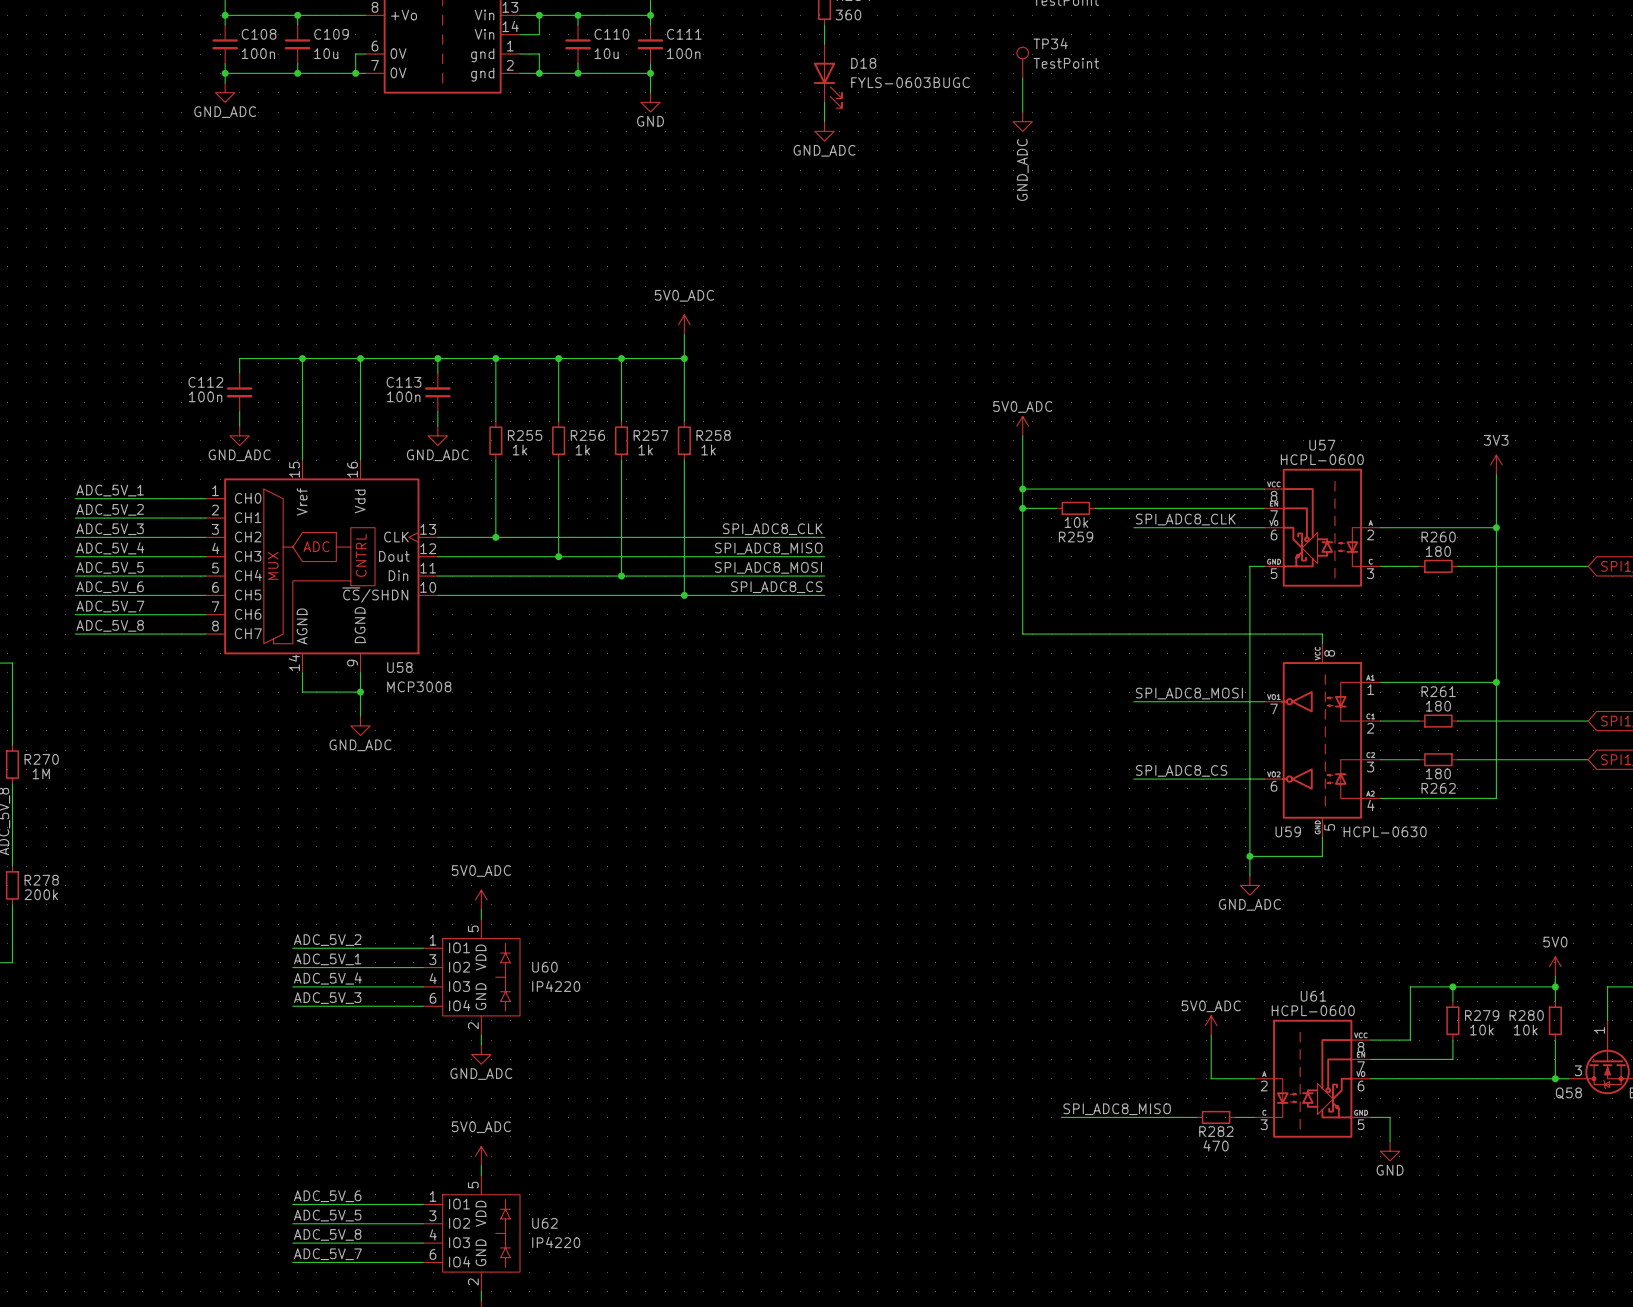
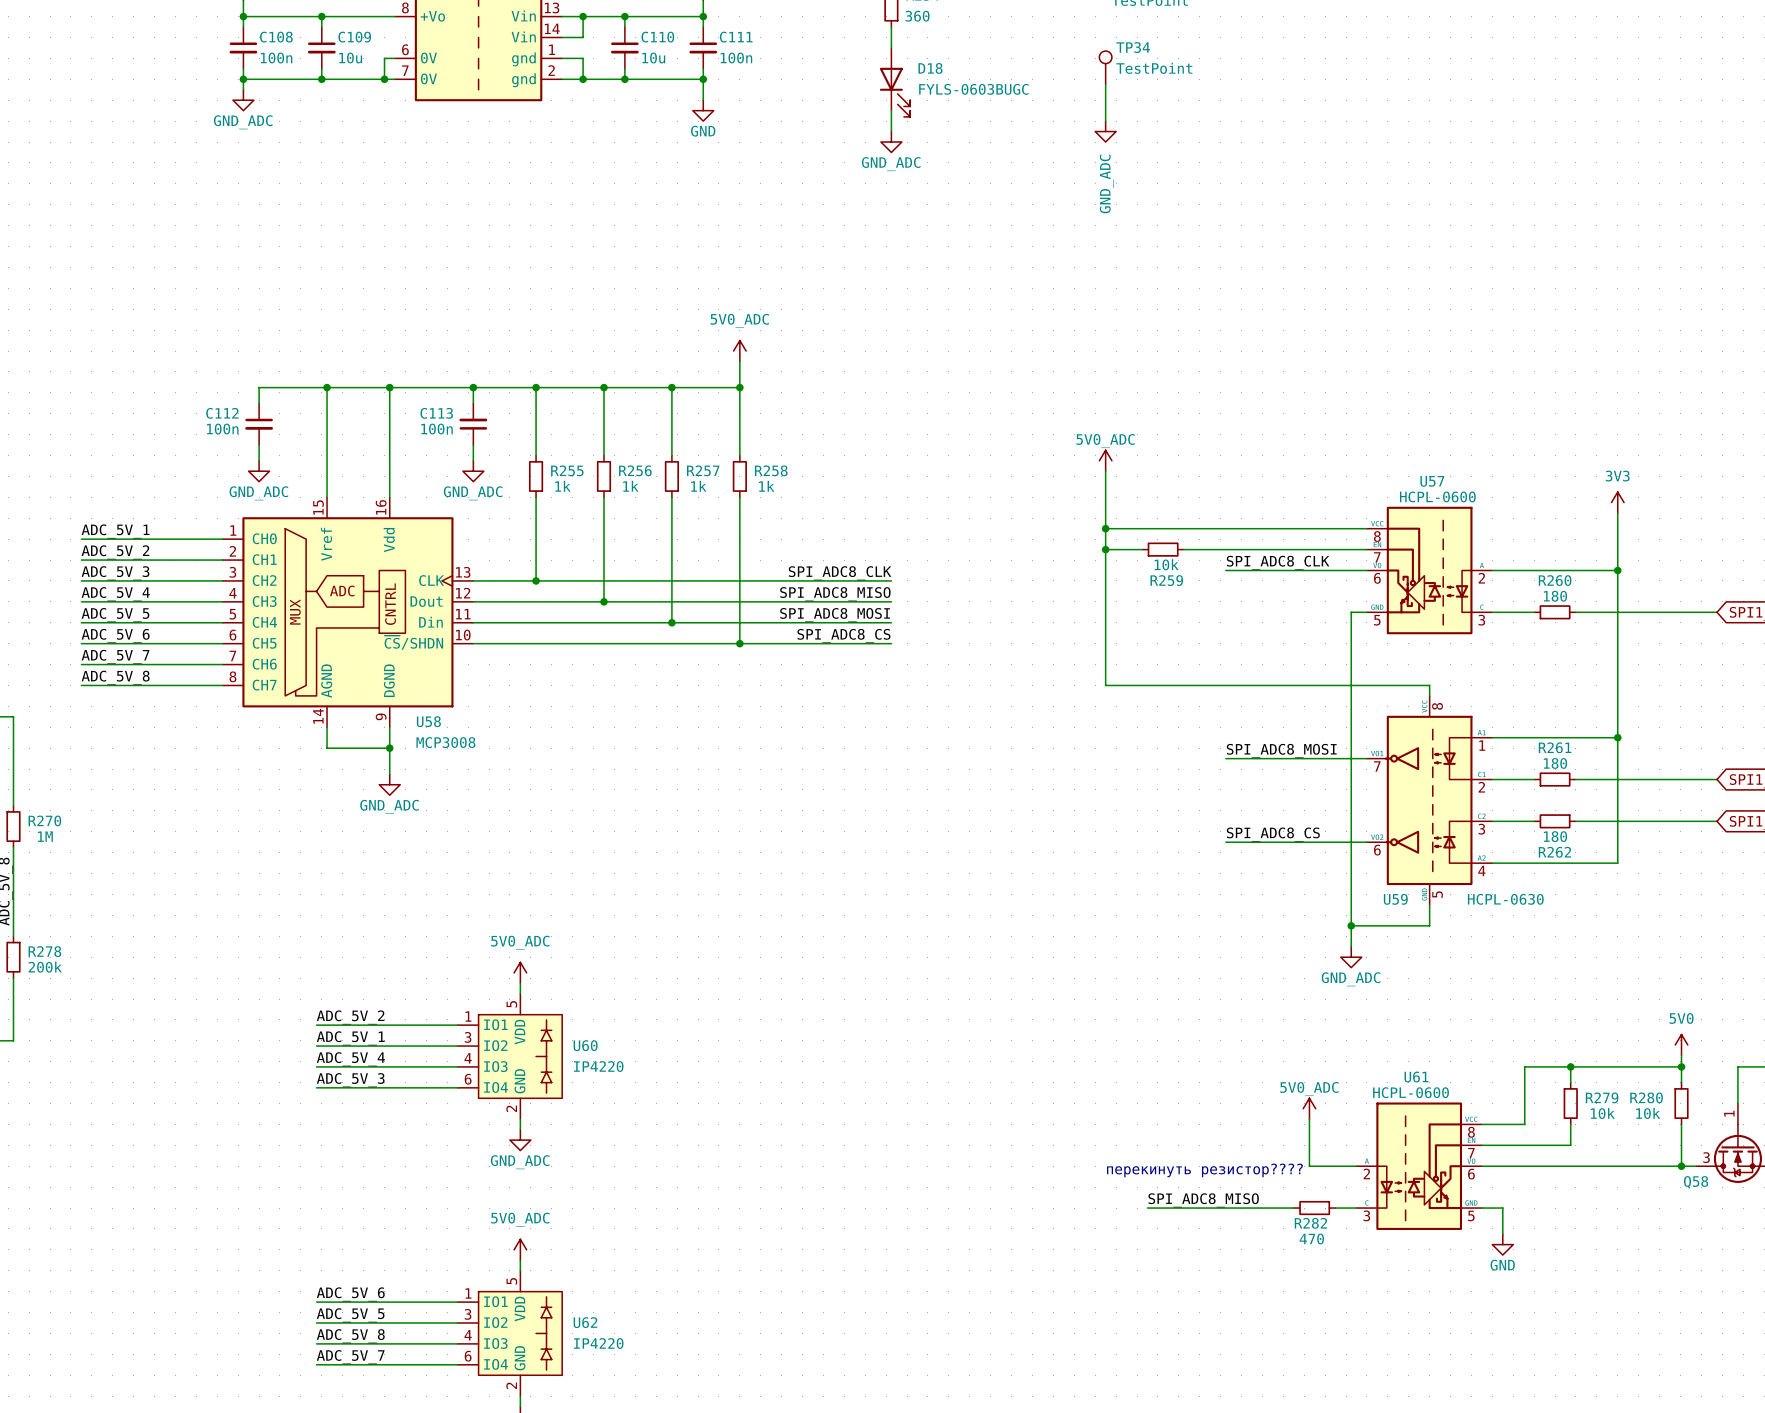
text: none -> перeкинуть резистор???? (1204, 1170)

